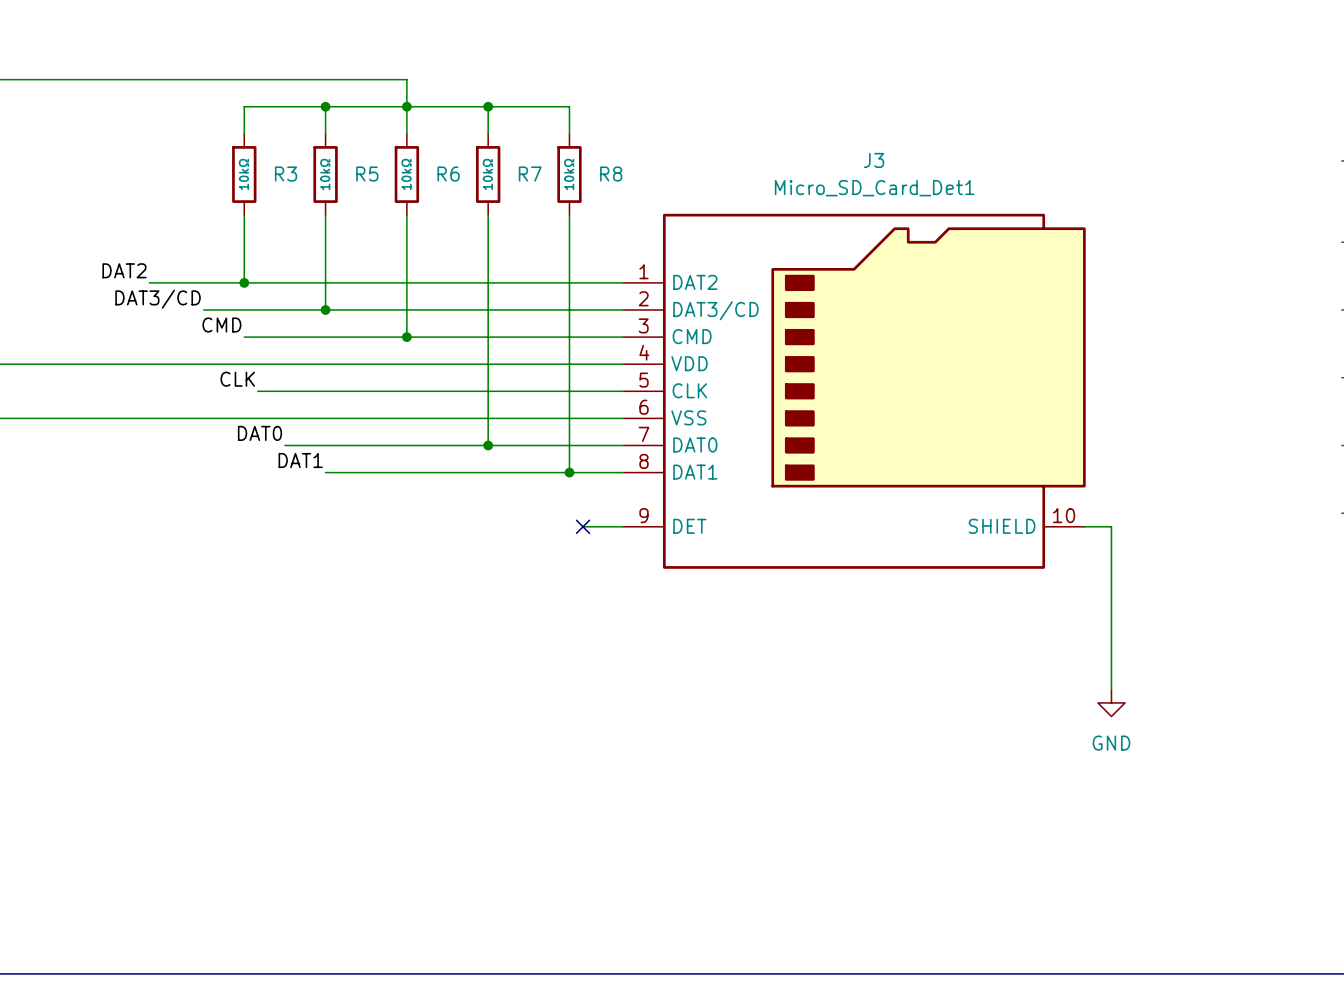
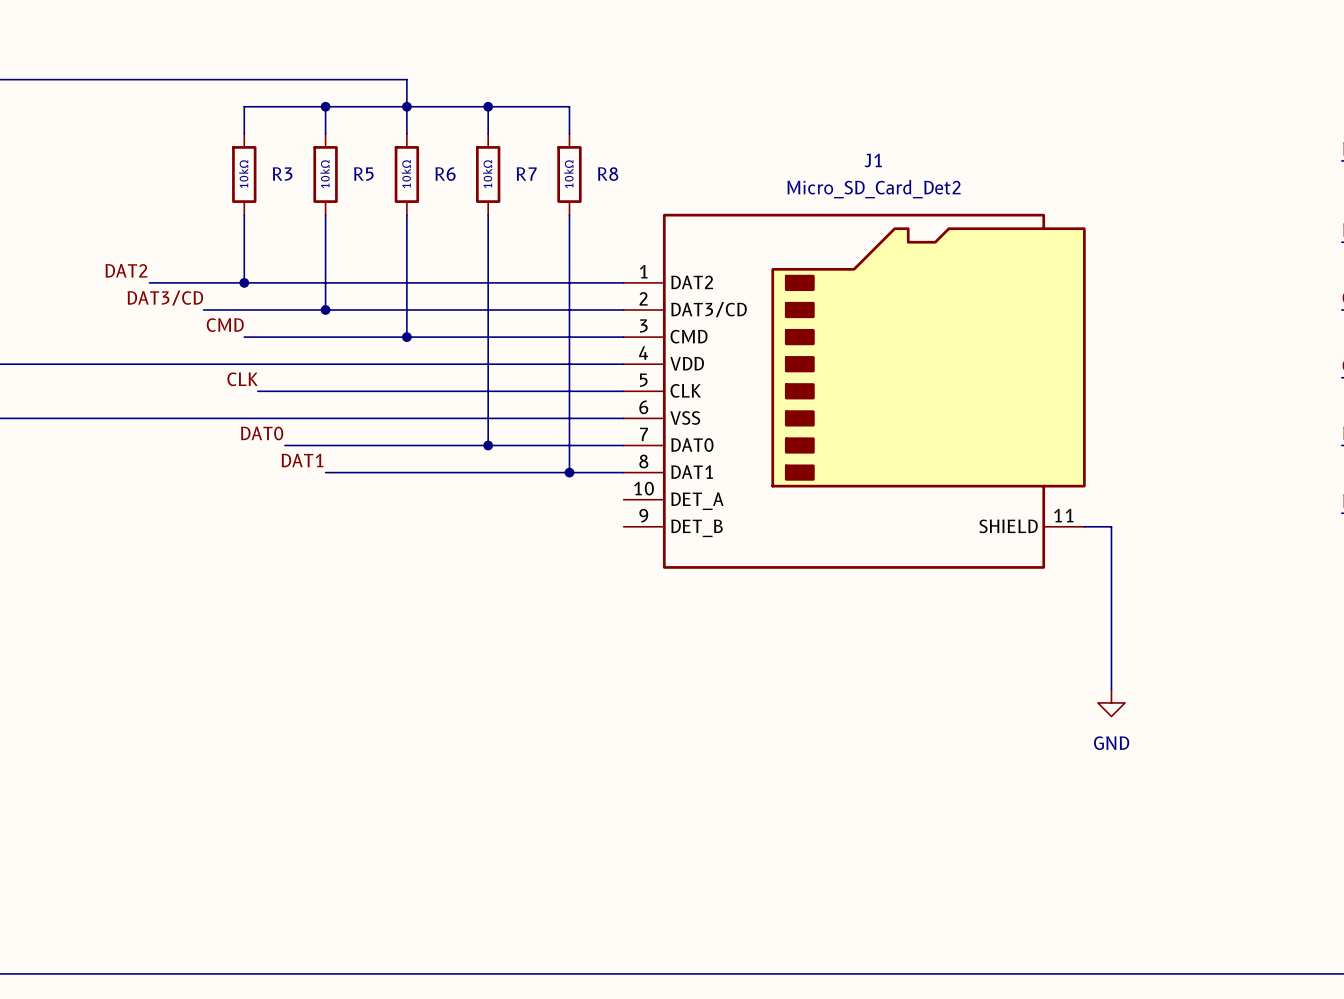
J3: Micro_SD_Card_Det1 (854, 391) -> none
J1: none -> Micro_SD_Card_Det2 (854, 391)
wire: (583, 526) (623, 526) -> none
no-connect mark: (583, 526) -> none

